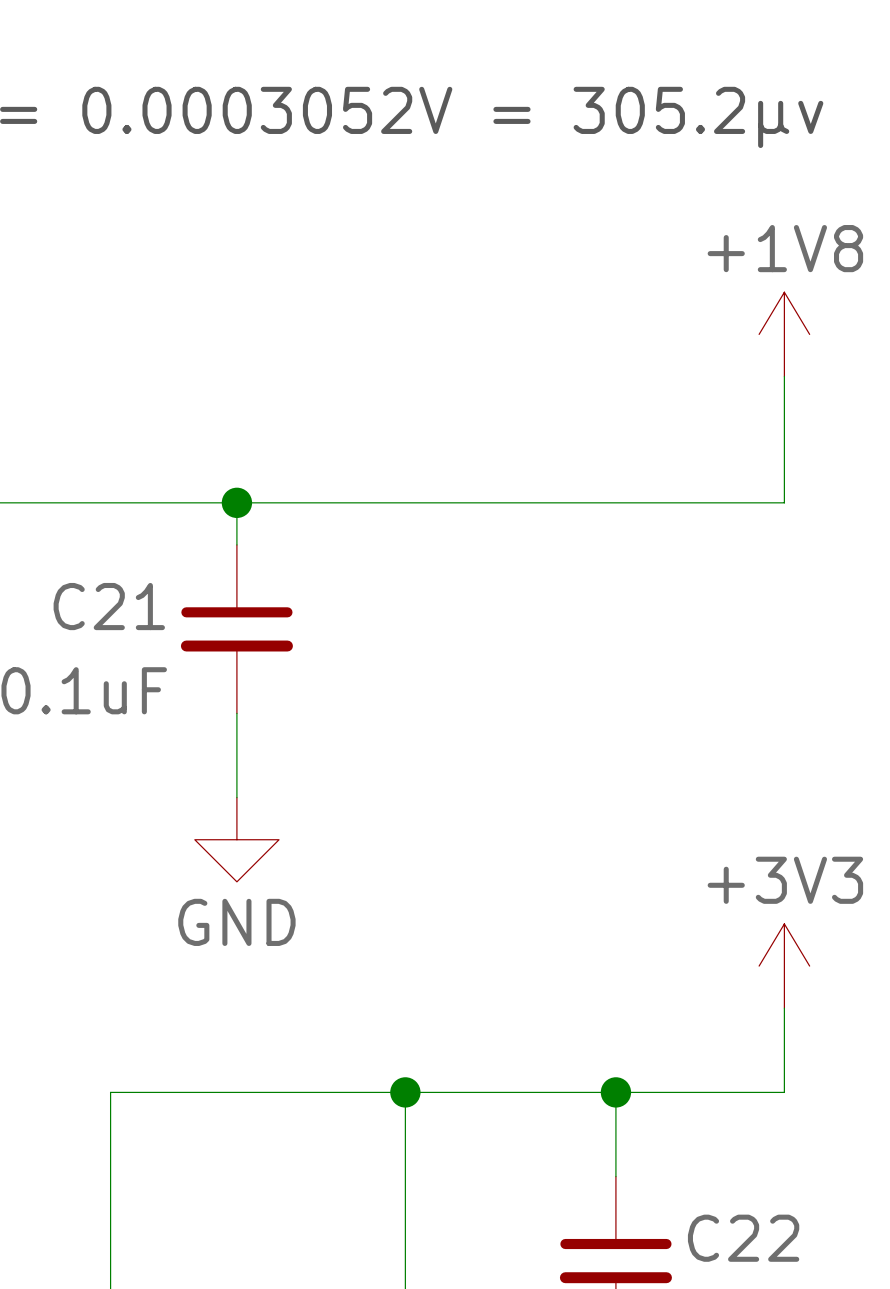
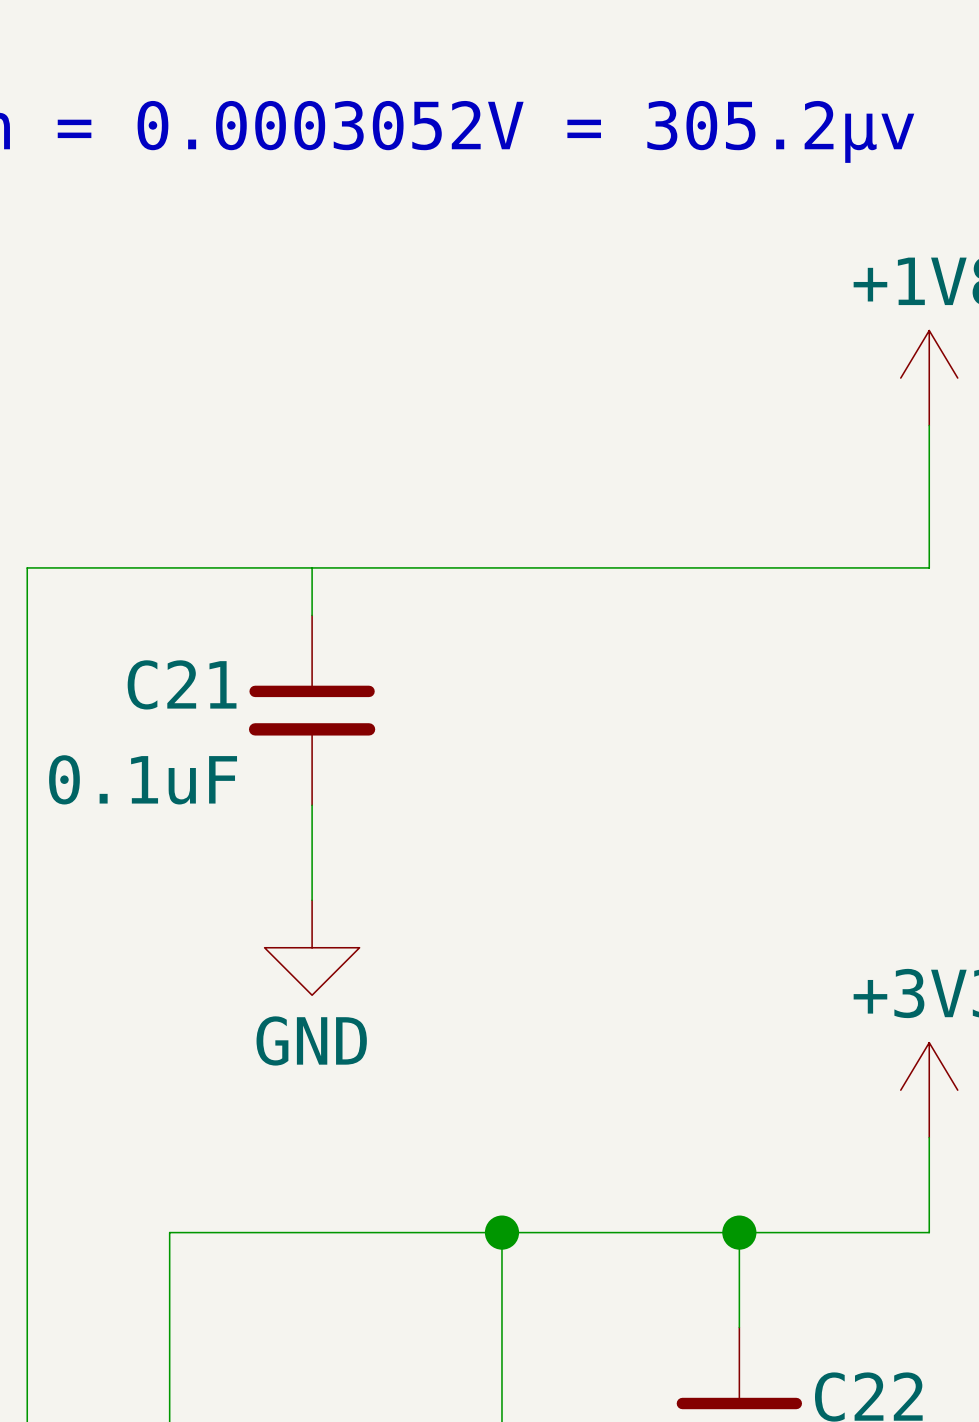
junction: (236, 502) -> none

